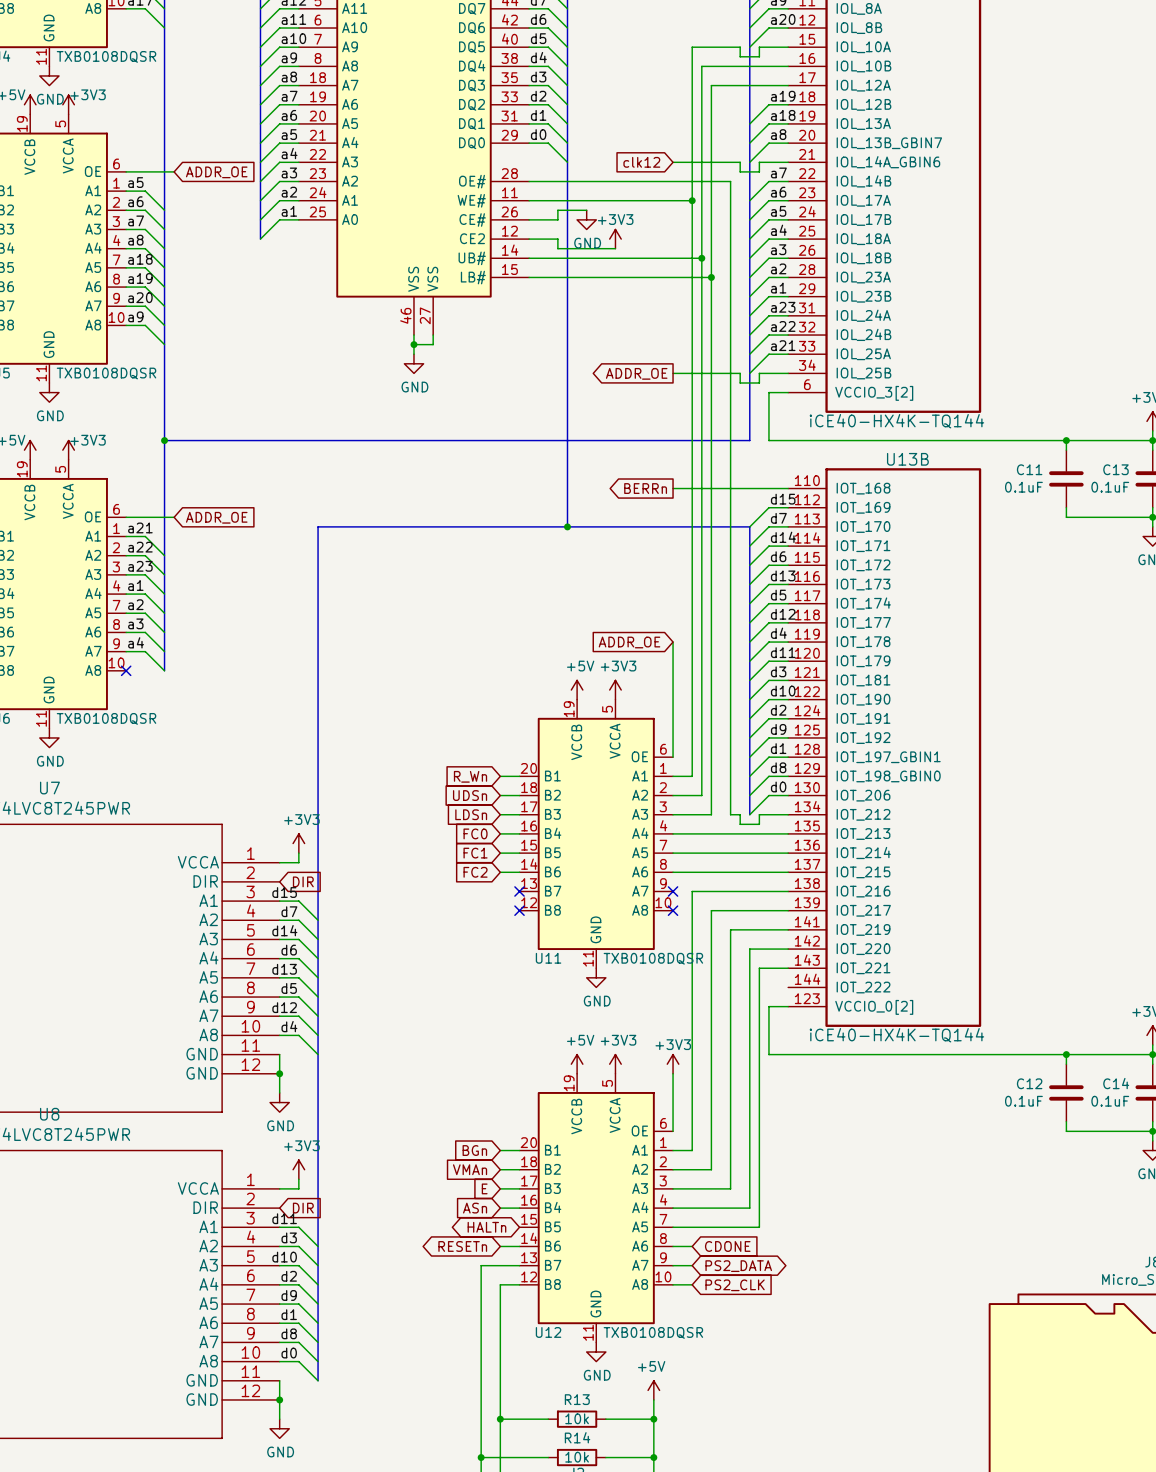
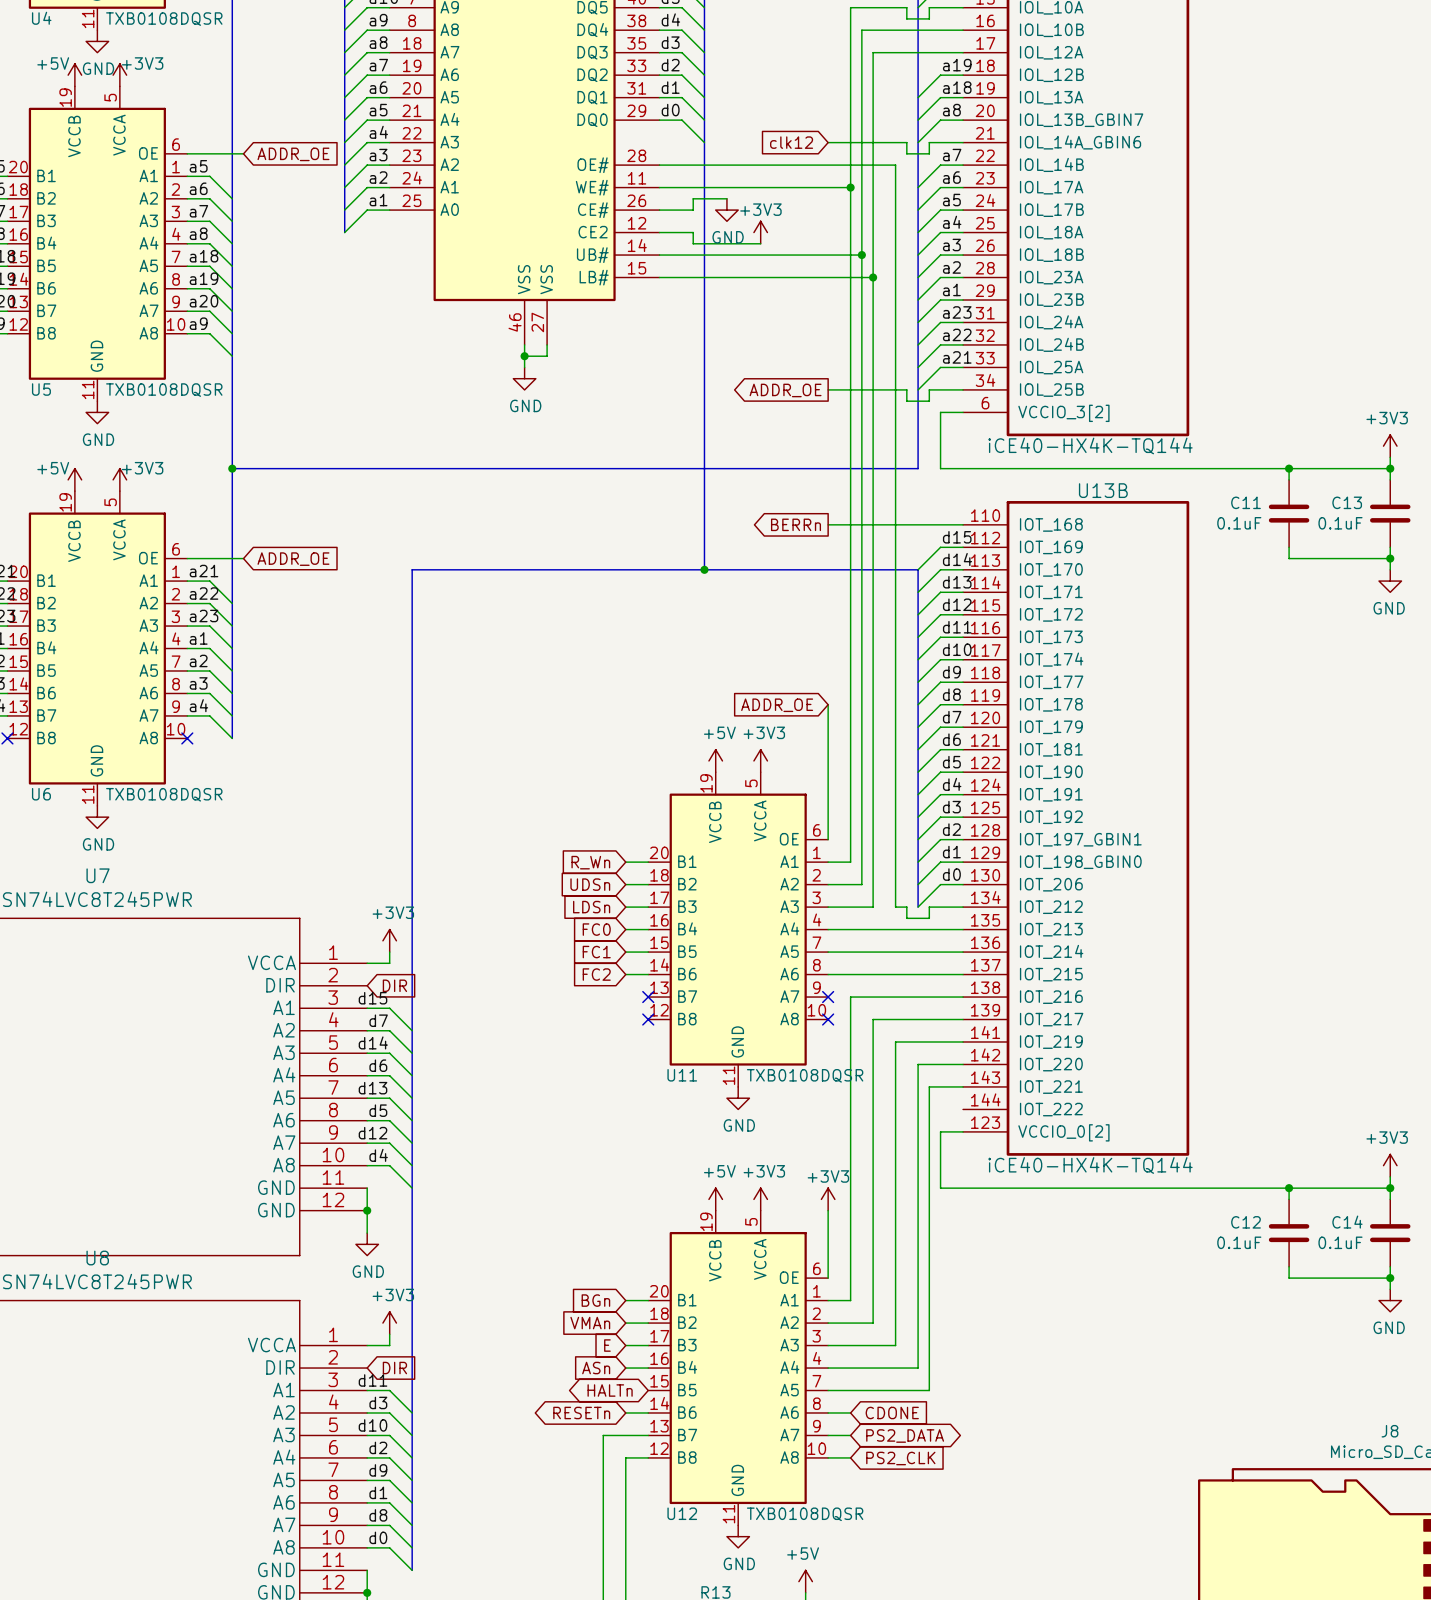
label: d7 (778, 518) -> d14 (957, 559)
label: d14 (783, 537) -> d13 (957, 582)
label: d6 (778, 556) -> d12 (957, 604)
label: d13 (783, 575) -> d11 (957, 627)
label: d5 (778, 595) -> d10 (957, 649)
label: d12 (783, 614) -> d9 (951, 672)
label: d4 (778, 633) -> d8 (951, 694)
label: d11 (783, 652) -> d7 (952, 717)
label: d3 (778, 671) -> d6 (951, 739)
label: d10 (783, 691) -> d5 (951, 762)
label: d2 (778, 710) -> d4 (952, 784)
label: d9 (778, 729) -> d3 (951, 807)
label: d1 (778, 748) -> d2 (951, 829)
label: d8 (778, 767) -> d1 (951, 852)

